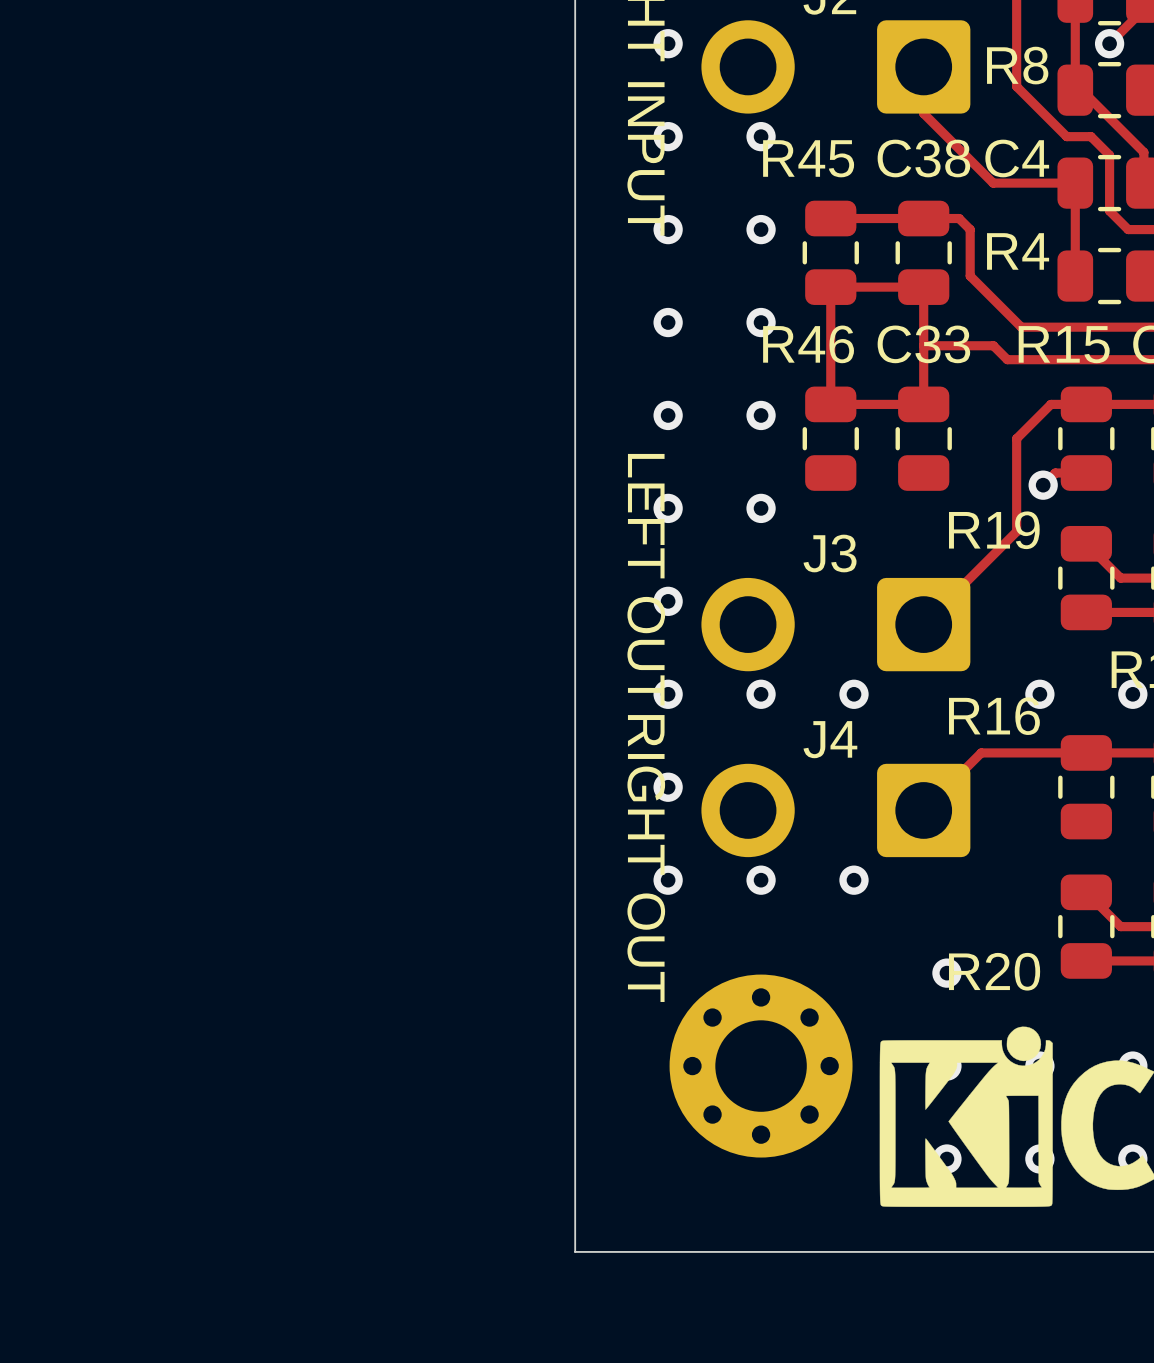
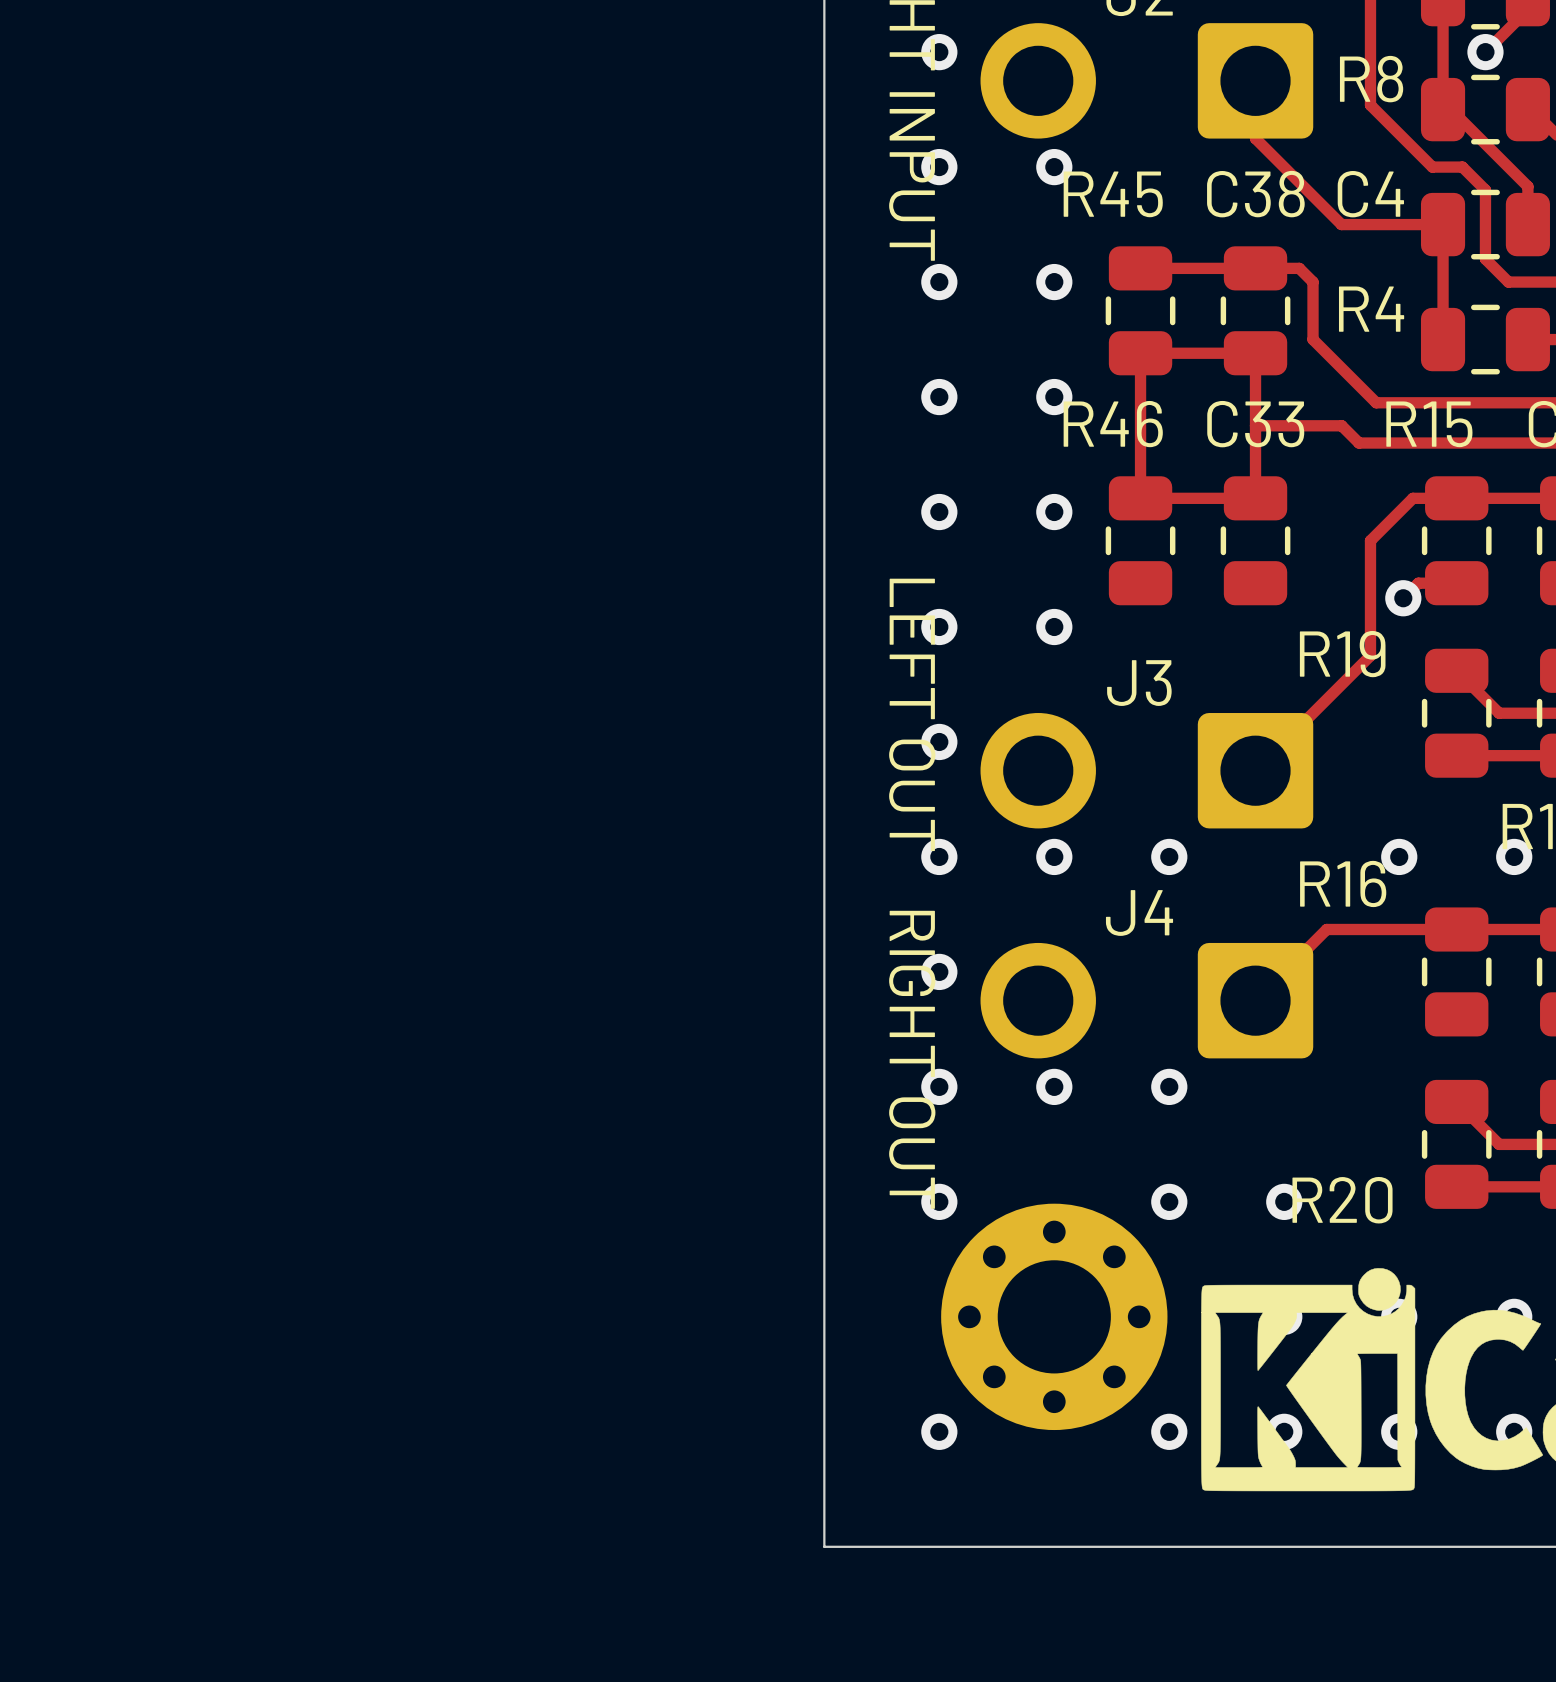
via: none -> (939, 1201)
via: none -> (1169, 1201)
via: none -> (939, 1431)
via: none -> (1169, 1431)

